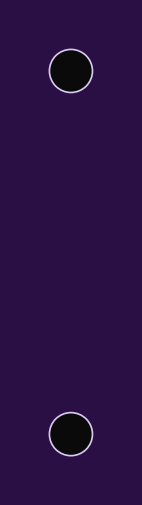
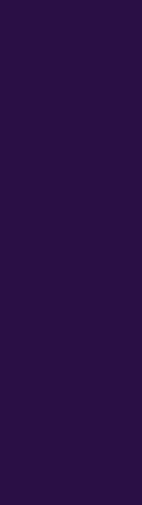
part: (70, 70) -> none
part: (70, 434) -> none

